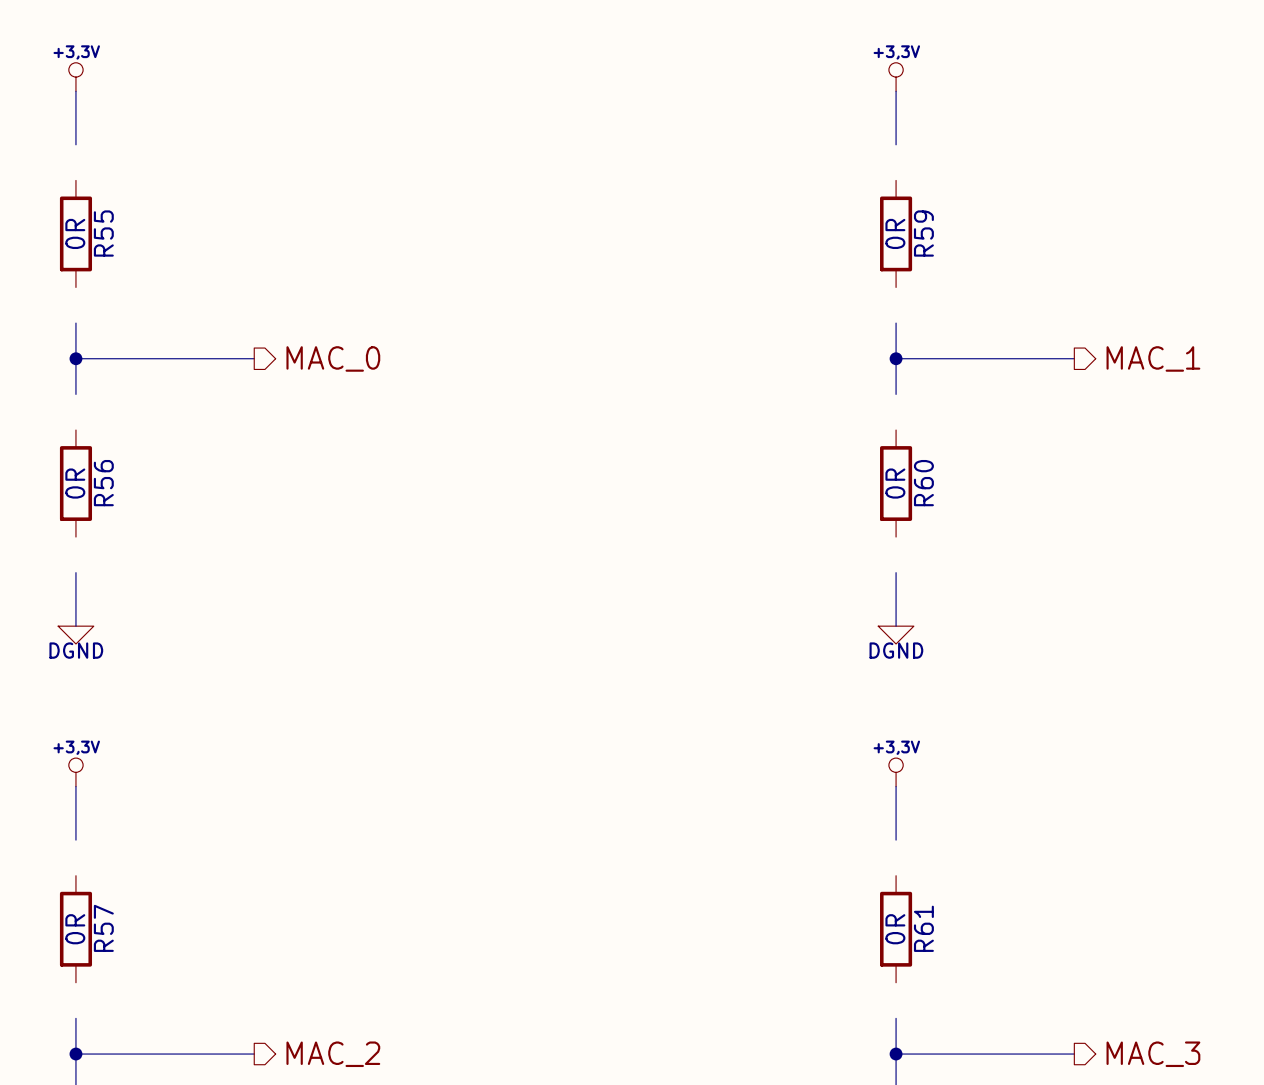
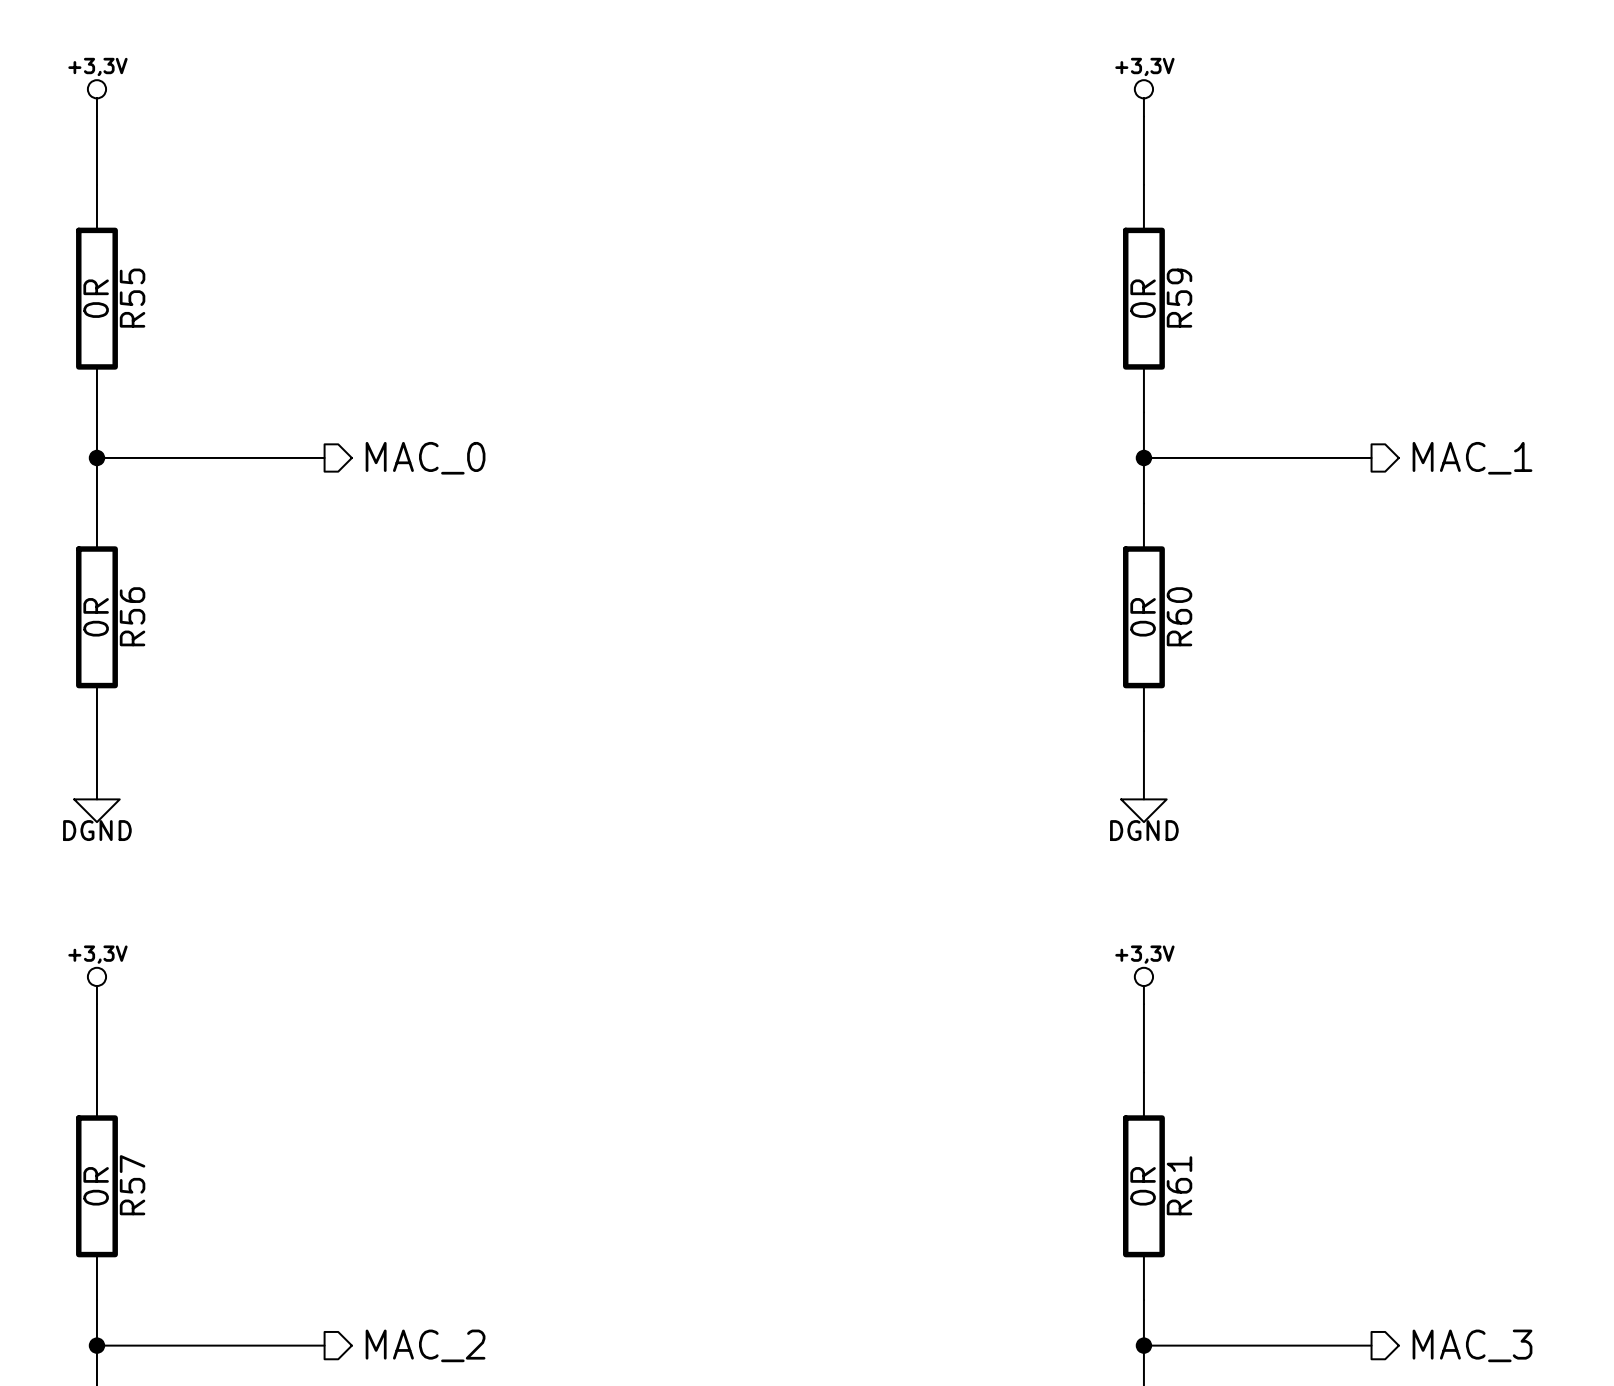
R55 symbol: [59, 180, 93, 288] -> [76, 184, 118, 413]
R59 symbol: [880, 180, 913, 288] -> [1123, 184, 1165, 413]
R56 symbol: [59, 430, 93, 538] -> [76, 503, 118, 732]
R60 symbol: [880, 430, 913, 538] -> [1123, 503, 1165, 732]
R57 symbol: [59, 875, 93, 983] -> [76, 1072, 118, 1301]
R61 symbol: [880, 875, 913, 983] -> [1123, 1072, 1165, 1301]

